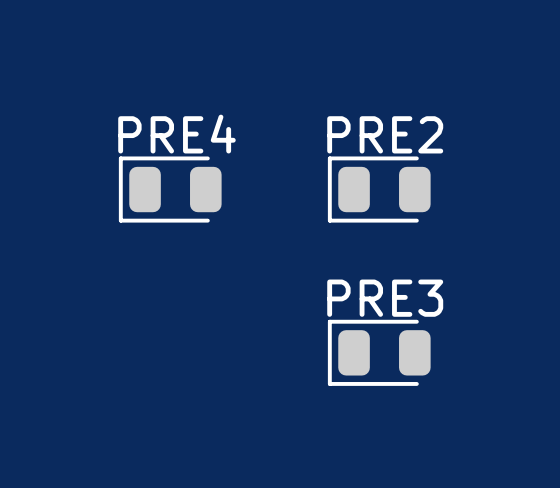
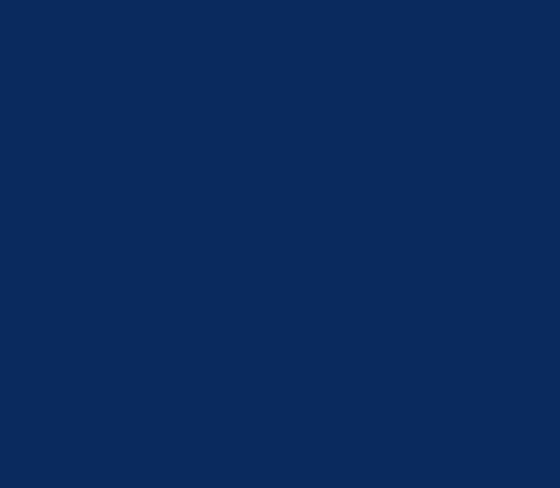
PRE4: (170, 189) -> none
PRE2: (379, 189) -> none
PRE3: (379, 352) -> none

